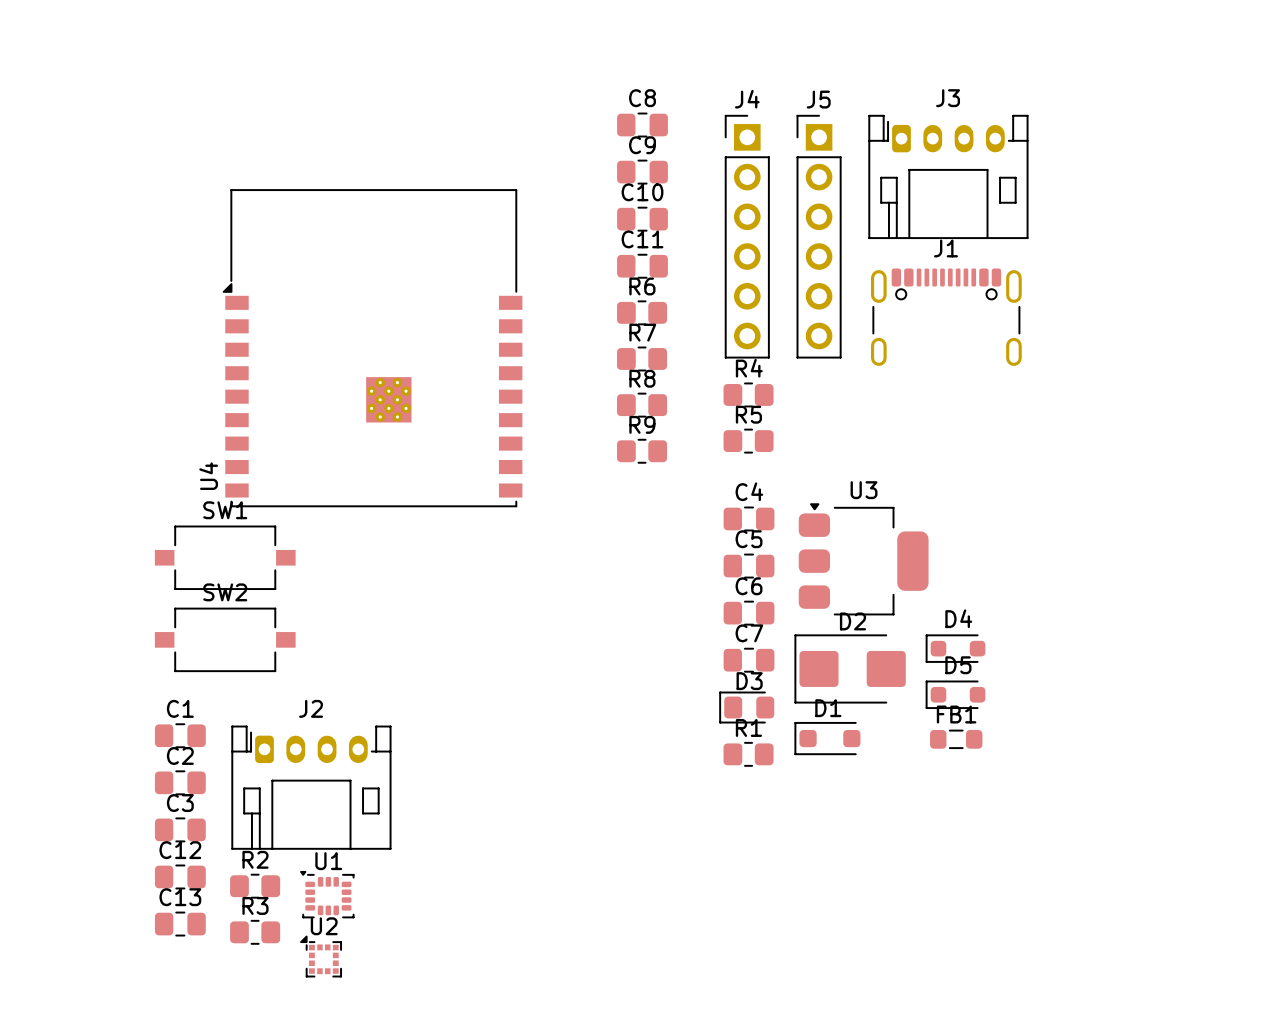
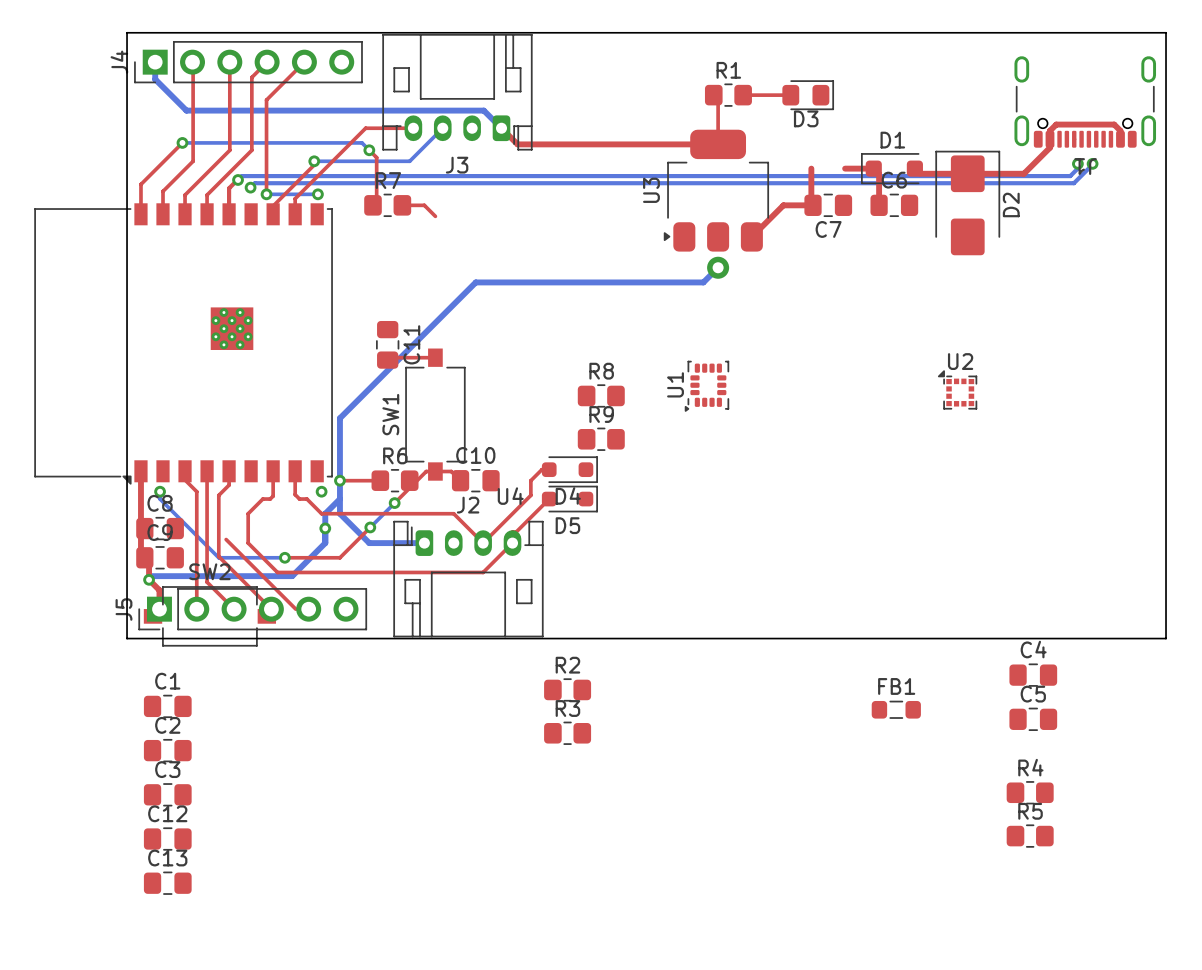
board edge: none -> (127, 32) (1166, 32) (1166, 638) (127, 638) (127, 32)
bottom track: none -> (155, 62) (155, 79) (186, 110) (483, 110) (501, 128)
top track: none -> (192, 62) (193, 161) (163, 191) (163, 214)
top track: none -> (229, 62) (229, 150) (185, 195) (185, 214)
top track: none -> (267, 62) (251, 77) (251, 150) (207, 195) (207, 214)
top track: none -> (304, 62) (266, 100) (266, 194)
top track: none -> (713, 95) (718, 99) (718, 144) (517, 144) (501, 128)
top track: none -> (743, 95) (790, 95)
top track: none -> (413, 128) (365, 128) (295, 198) (295, 214)
bottom track: none -> (442, 128) (409, 161) (314, 161)
C8 position: (642, 125) -> (160, 528)
top track: none -> (1120, 139) (1120, 130) (1114, 124) (1056, 124) (1049, 130) (1049, 147) (1023, 173) (920, 173) (914, 168)
top track: none -> (182, 142) (140, 184) (140, 214)
bottom track: none -> (182, 142) (361, 142) (369, 150)
via: none -> (182, 142)
top track: none -> (369, 150) (376, 157) (376, 201) (373, 205)
via: none -> (369, 150)
top track: none -> (314, 161) (314, 164) (273, 206) (273, 214)
via: none -> (314, 161)
bottom track: none -> (1077, 163) (1077, 168) (1070, 176) (241, 176) (239, 181) (238, 179)
via: none -> (1077, 163)
bottom track: none -> (1092, 163) (1073, 183) (254, 183) (250, 187)
via: none -> (1092, 163)
top track: none -> (811, 168) (811, 203) (813, 205) (783, 205) (751, 236)
top track: none -> (845, 168) (873, 168) (879, 173) (879, 205)
C9 position: (642, 172) -> (160, 557)
top track: none -> (238, 179) (229, 188) (229, 214)
via: none -> (238, 179)
J3 rotation: 0° (948, 176) -> 180° (457, 92)
J3 position: (948, 176) -> (457, 92)
via: none -> (250, 187)
bottom track: none -> (266, 194) (317, 194)
via: none -> (266, 194)
via: none -> (317, 194)
top track: none -> (402, 205) (424, 205) (435, 216)
C10 position: (642, 219) -> (475, 480)
J4 rotation: 0° (747, 236) -> 90° counterclockwise (248, 62)
J4 position: (747, 236) -> (248, 62)
J5 rotation: 0° (819, 236) -> 90° counterclockwise (252, 609)
J5 position: (819, 236) -> (252, 609)
C11 rotation: 0° (642, 266) -> 90° clockwise (387, 344)
C11 position: (642, 266) -> (387, 344)
bottom track: none -> (718, 267) (703, 282) (475, 282) (339, 418) (339, 513) (369, 543) (424, 543)
via: none -> (718, 267)
R6 position: (642, 312) -> (395, 480)
J1 rotation: 0° (946, 317) -> 180° (1085, 101)
J1 position: (946, 317) -> (1085, 101)
U4 rotation: 0° (372, 348) -> 90° counterclockwise (183, 343)
R7 position: (642, 358) -> (387, 205)
top track: none -> (435, 357) (390, 357) (387, 360)
R4 position: (748, 394) -> (1030, 792)
R5 position: (748, 441) -> (1030, 836)
U4 name position: U4 (208, 476) -> U4 (510, 496)
top track: none -> (549, 469) (541, 469) (530, 480) (530, 495) (483, 543) (453, 513) (321, 513) (306, 499) (299, 499) (295, 494) (295, 471)
top track: none -> (140, 471) (140, 553) (149, 562) (149, 579) (159, 590) (159, 609)
top track: none -> (185, 471) (185, 479) (196, 491) (196, 609)
top track: none -> (207, 471) (207, 582) (234, 609)
top track: none -> (229, 471) (229, 485) (218, 495) (218, 556) (271, 609)
top track: none -> (273, 471) (273, 496) (270, 499) (262, 499) (248, 513) (248, 543) (277, 572) (483, 572) (512, 543) (512, 532) (516, 532) (549, 499)
top track: none -> (339, 480) (380, 480)
via: none -> (339, 480)
top track: none -> (460, 480) (451, 471) (426, 471) (394, 503)
bottom track: none -> (160, 491) (160, 499) (218, 557) (284, 557)
via: none -> (160, 491)
via: none -> (321, 491)
SW1 name position: SW1 (225, 510) -> SW1 (390, 414)
bottom track: none -> (339, 499) (325, 513) (325, 543) (292, 576) (149, 576) (149, 579)
C4 position: (749, 518) -> (1033, 675)
bottom track: none -> (394, 503) (370, 527)
via: none -> (394, 503)
top track: none -> (370, 527) (339, 557) (284, 557)
via: none -> (370, 527)
via: none -> (325, 528)
SW1 rotation: 0° (225, 557) -> 90° clockwise (435, 414)
SW1 position: (225, 557) -> (435, 414)
top track: none -> (226, 539) (295, 609)
U3 rotation: 0° (863, 559) -> 90° counterclockwise (716, 190)
U3 position: (863, 559) -> (716, 190)
C5 position: (749, 566) -> (1033, 719)
via: none -> (284, 557)
via: none -> (149, 579)
C6 position: (749, 613) -> (894, 205)
C7 name position: C7 (749, 633) -> C7 (828, 229)
D4 rotation: 0° (955, 648) -> 180° (569, 469)
D4 position: (955, 648) -> (569, 469)
C7 position: (749, 660) -> (828, 205)
D2 rotation: 0° (850, 668) -> 90° clockwise (967, 202)
D2 position: (850, 668) -> (967, 202)
D5 rotation: 0° (955, 694) -> 180° (569, 499)
D5 position: (955, 694) -> (569, 499)
D3 rotation: 0° (746, 707) -> 180° (808, 95)
D3 position: (746, 707) -> (808, 95)
D1 position: (827, 738) -> (891, 168)
R1 position: (748, 754) -> (728, 95)
J2 position: (311, 787) -> (468, 579)
R2 position: (255, 886) -> (567, 689)
U1 rotation: 0° (327, 894) -> 90° counterclockwise (706, 386)
U1 position: (327, 894) -> (706, 386)
R3 position: (255, 932) -> (567, 733)
U2 position: (321, 956) -> (957, 389)

